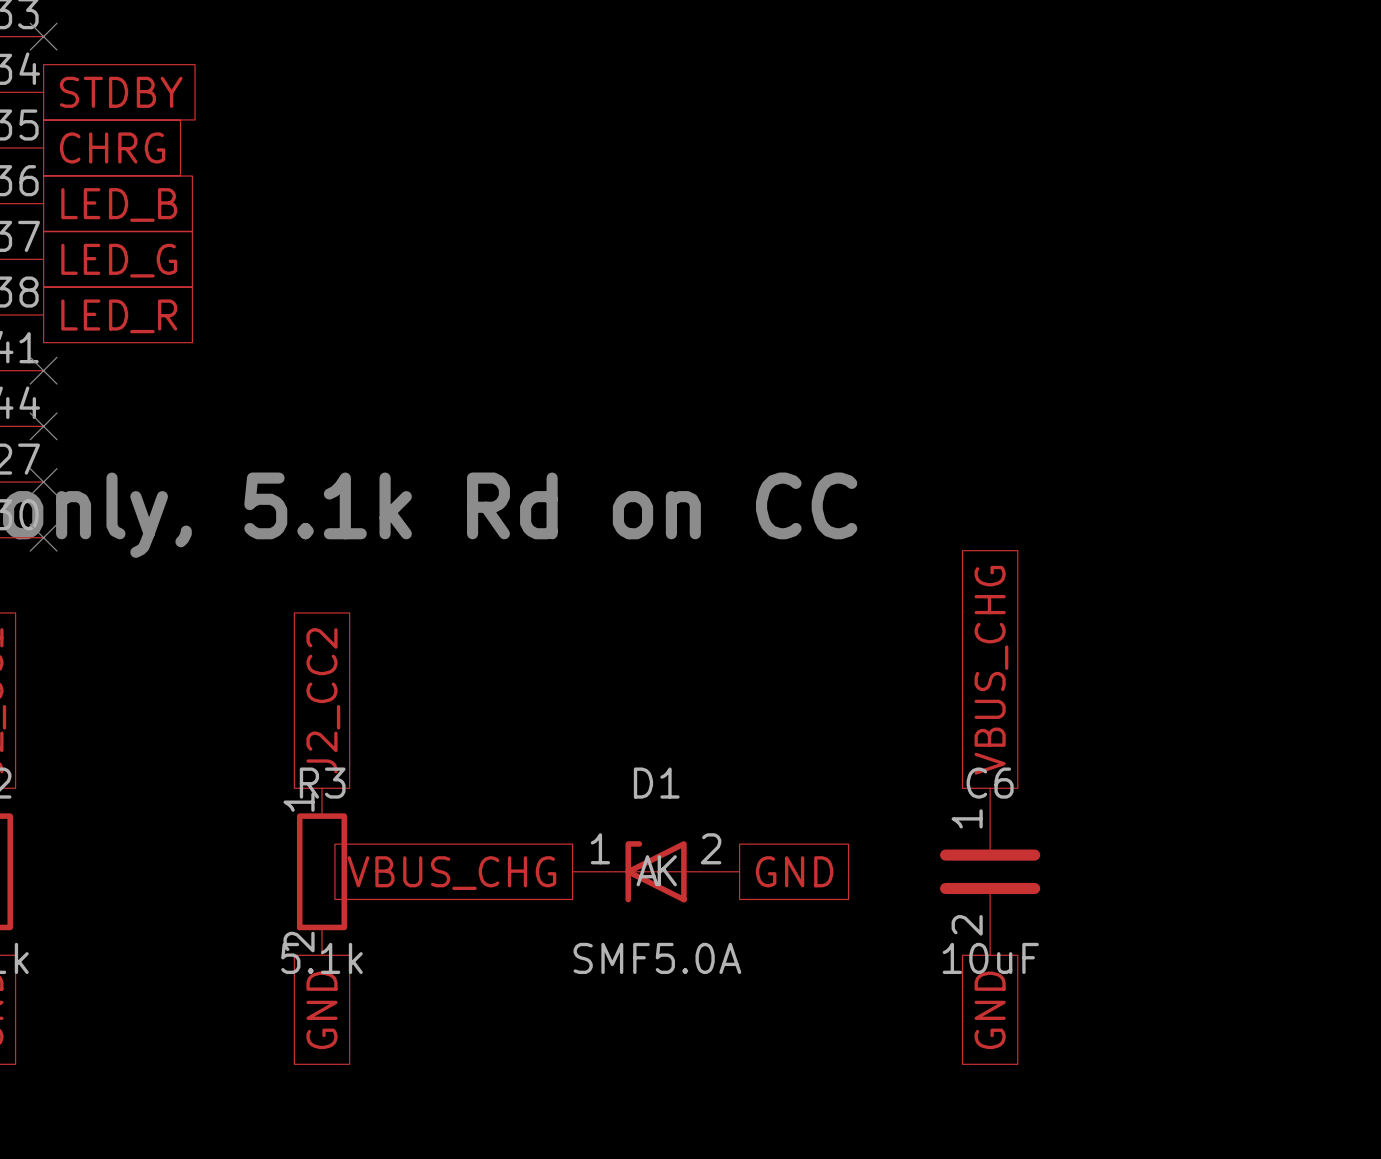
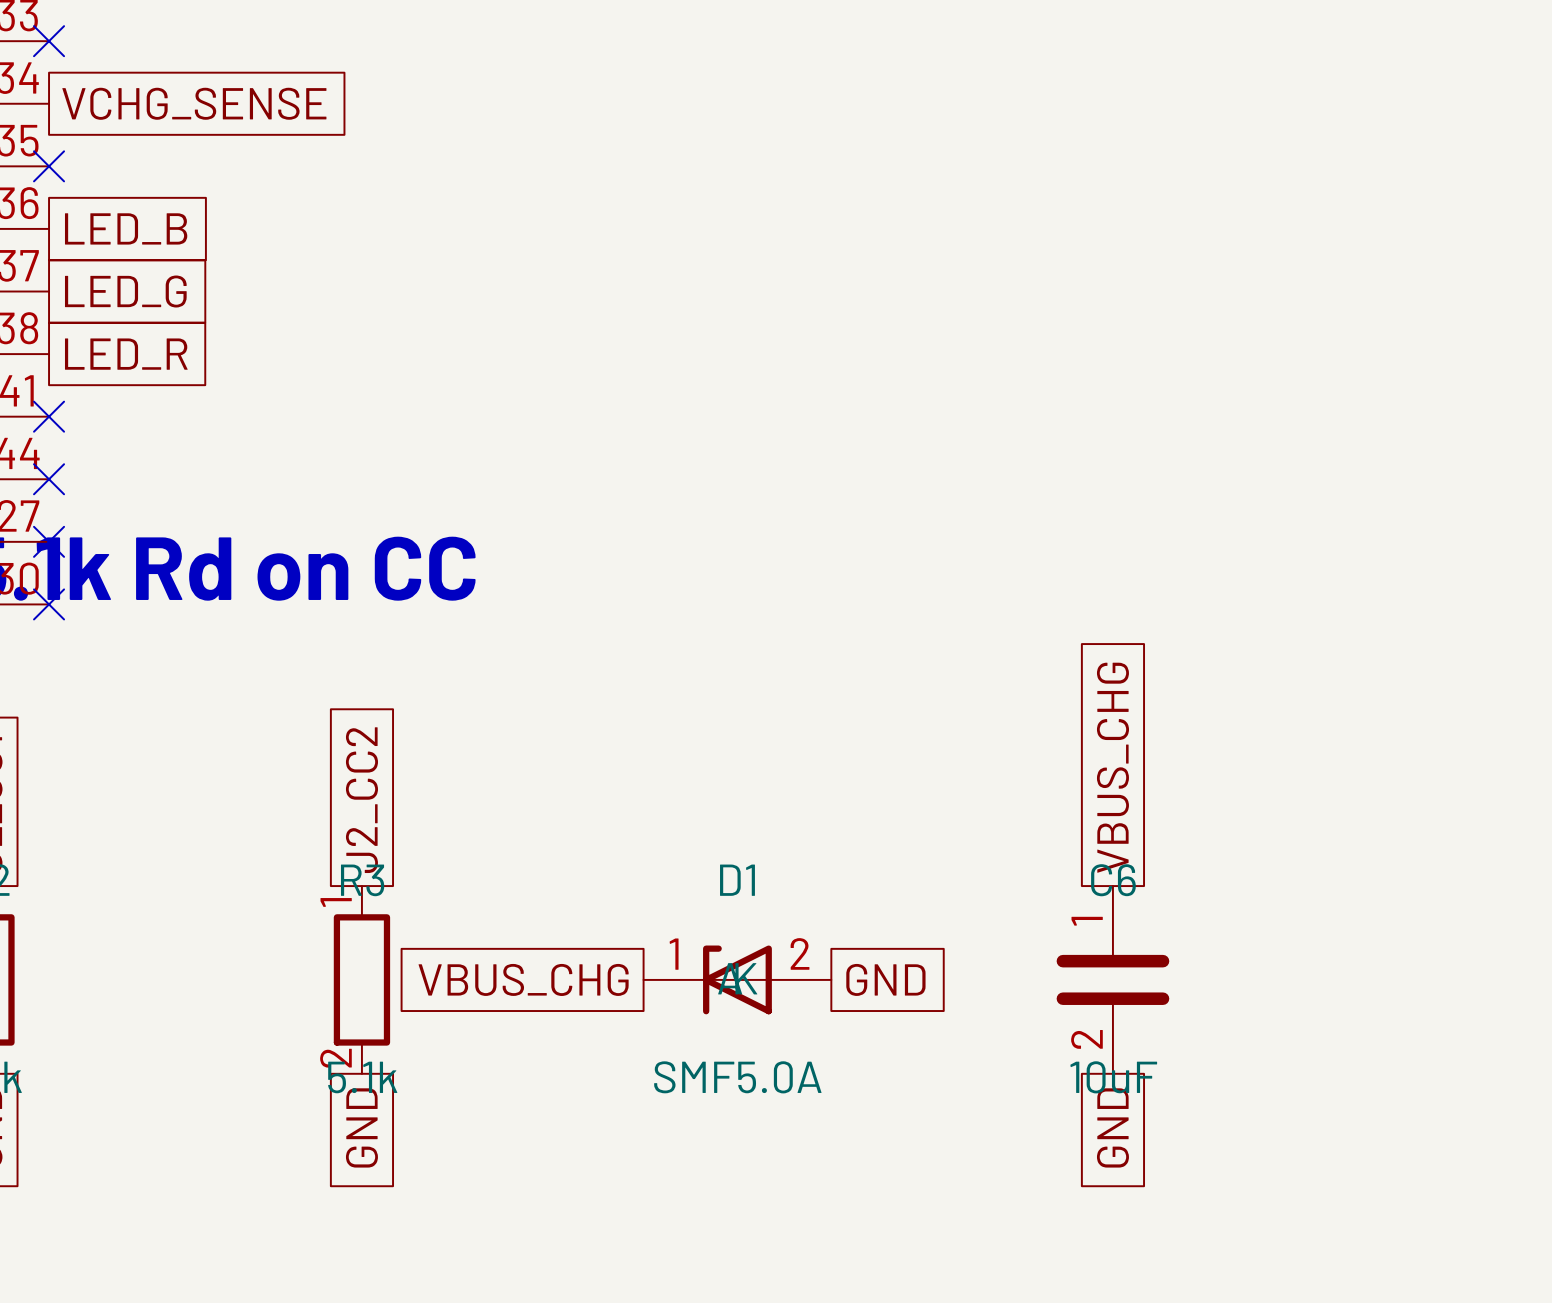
global label: STDBY (121, 92) -> VCHG_SENSE (194, 103)
no-connect mark: none -> (49, 166)
global label: CHRG (112, 147) -> none

